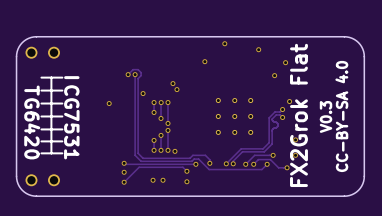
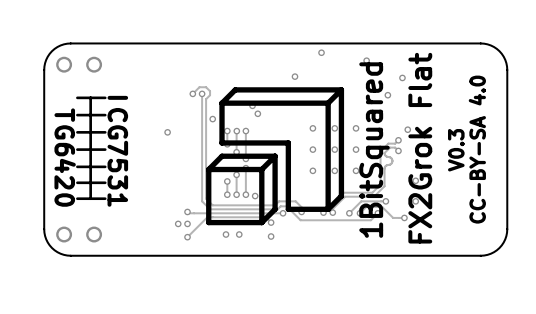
drawing: none -> [206, 87, 345, 226]
text: none -> 1BitSquared (374, 150)
via: none -> (178, 223)

